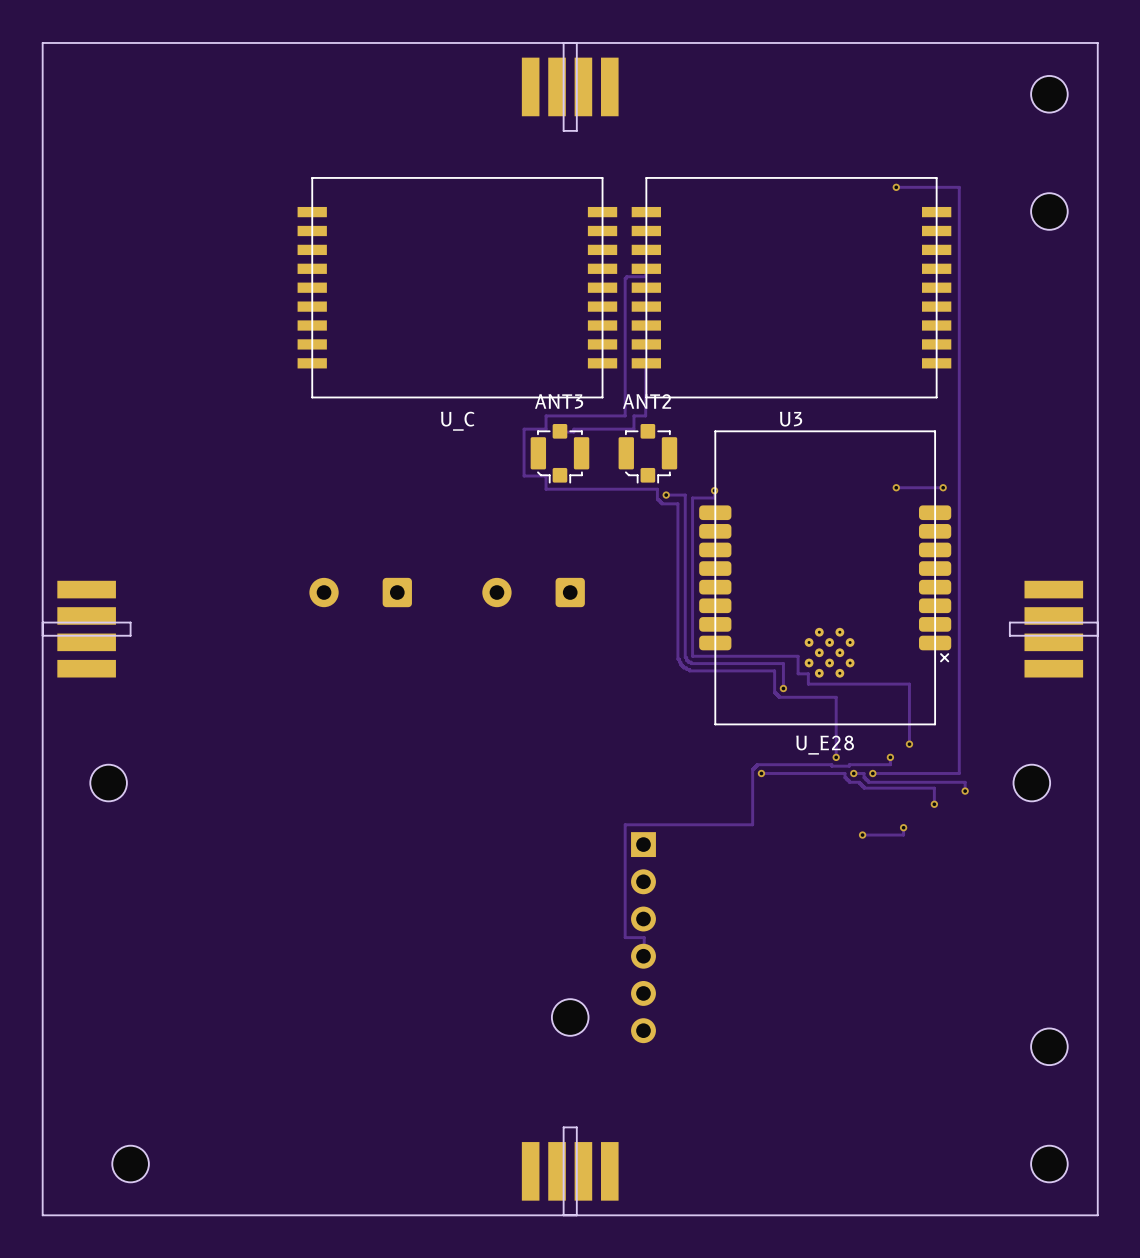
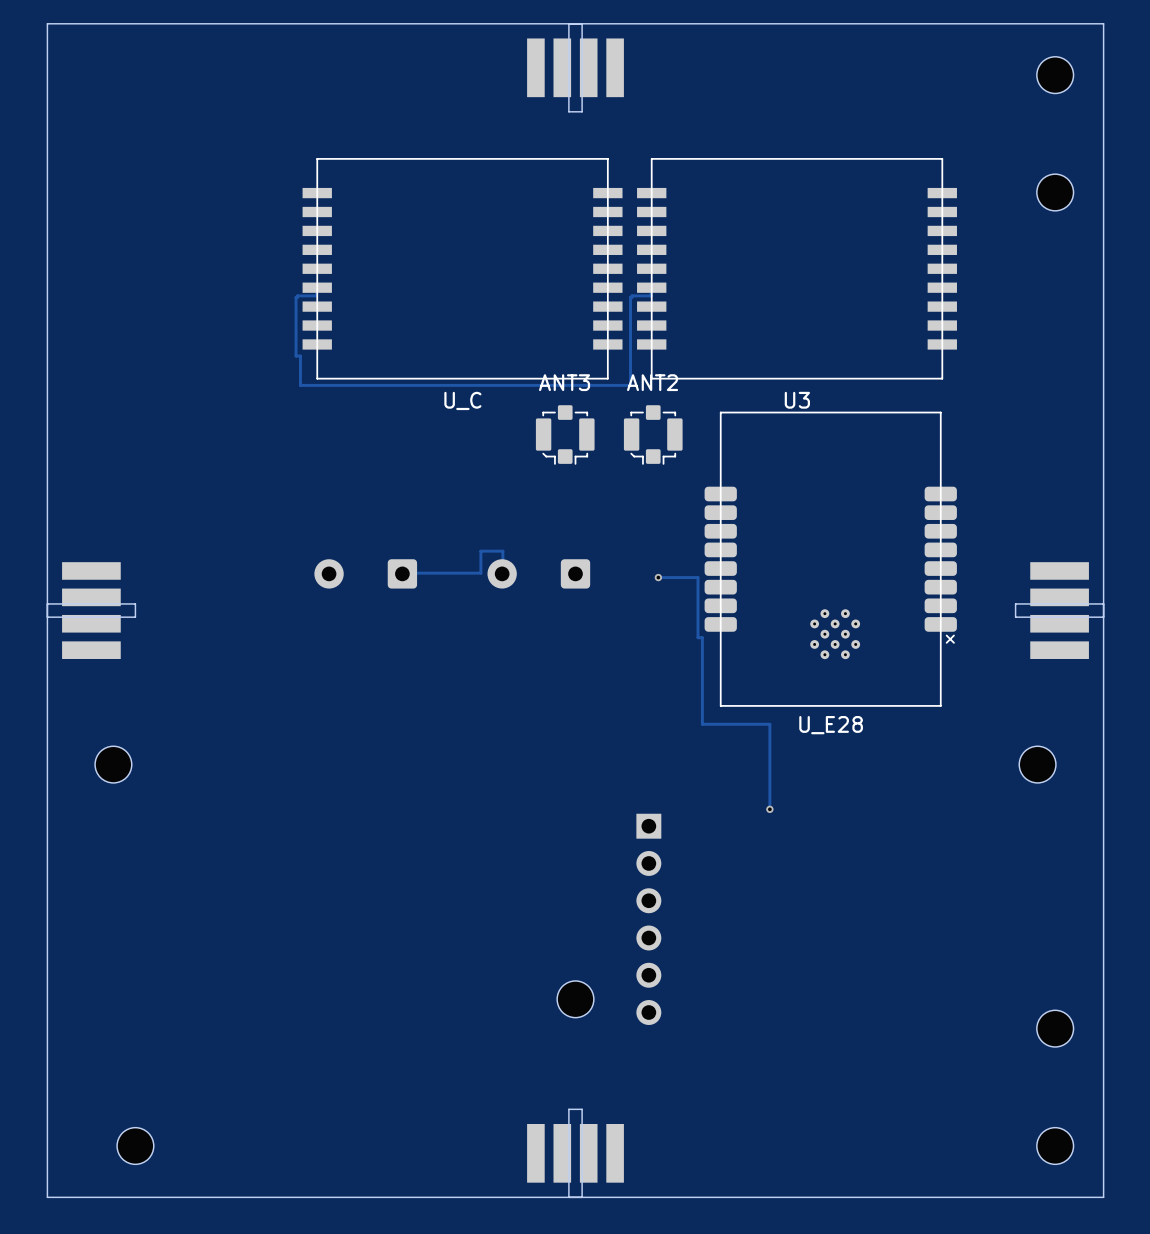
track: (896, 187) (959, 187) (959, 773) (872, 773) -> none
via: (896, 187) -> none
track: (645, 269) (645, 276) (625, 278) (625, 316) -> (651, 287) (651, 295) (630, 297)
track: (645, 363) (645, 415) (633, 415) (633, 429) (573, 429) (573, 432) (559, 432) -> none
track: (625, 404) (625, 415) (546, 415) (546, 429) (524, 429) (524, 476) (546, 476) (546, 489) (657, 489) (657, 499) (661, 503) (677, 503) (677, 659) (680, 665) (689, 670) (774, 670) (774, 692) (779, 697) (836, 697) (836, 757) -> (630, 385) (300, 385) (300, 356) (296, 356) (296, 297) (316, 295) (316, 287)
via: (896, 487) -> none
track: (943, 487) (896, 487) -> none
via: (943, 487) -> none
track: (714, 490) (714, 497) (692, 497) (692, 596) -> (658, 577) (697, 577)
via: (714, 490) -> none
track: (666, 495) (685, 495) (686, 660) (691, 663) (783, 663) (783, 688) -> none
via: (666, 495) -> none
track: none -> (502, 573) (502, 551) (480, 551) (480, 573) (403, 573)
via: none -> (658, 577)
track: (696, 656) (798, 656) (798, 673) (808, 673) (808, 684) (909, 684) (909, 744) -> (702, 637) (702, 724) (769, 724) (769, 809)
via: (783, 688) -> none
via: (909, 744) -> none
via: (836, 757) -> none
track: (890, 757) (890, 764) (757, 764) (752, 769) (752, 824) (625, 824) (625, 937) (644, 937) (644, 956) -> none
via: (890, 757) -> none
track: (761, 773) (844, 773) (844, 777) (849, 782) (859, 782) (864, 788) (934, 788) (934, 804) -> none
via: (761, 773) -> none
track: (853, 773) (864, 773) (864, 777) (868, 782) (965, 782) (965, 791) -> none
via: (853, 773) -> none
via: (872, 773) -> none
via: (965, 791) -> none
via: (934, 804) -> none
via: none -> (769, 809)
track: (903, 827) (903, 835) (862, 835) -> none
via: (903, 827) -> none
via: (862, 835) -> none

